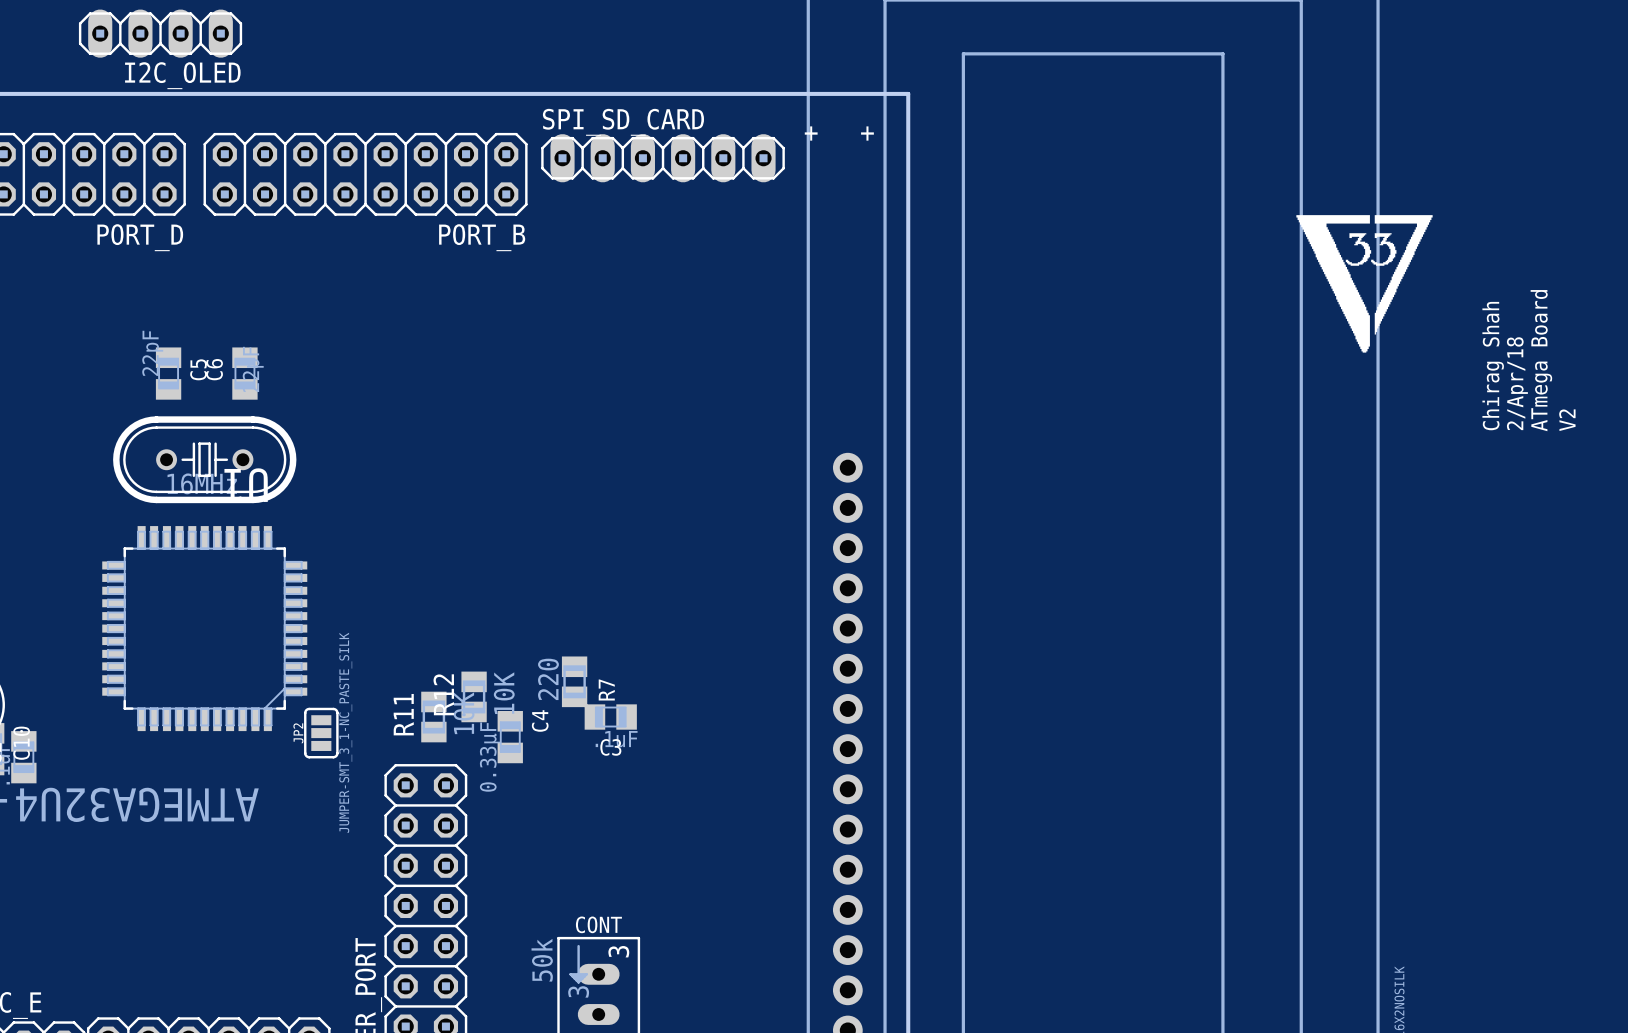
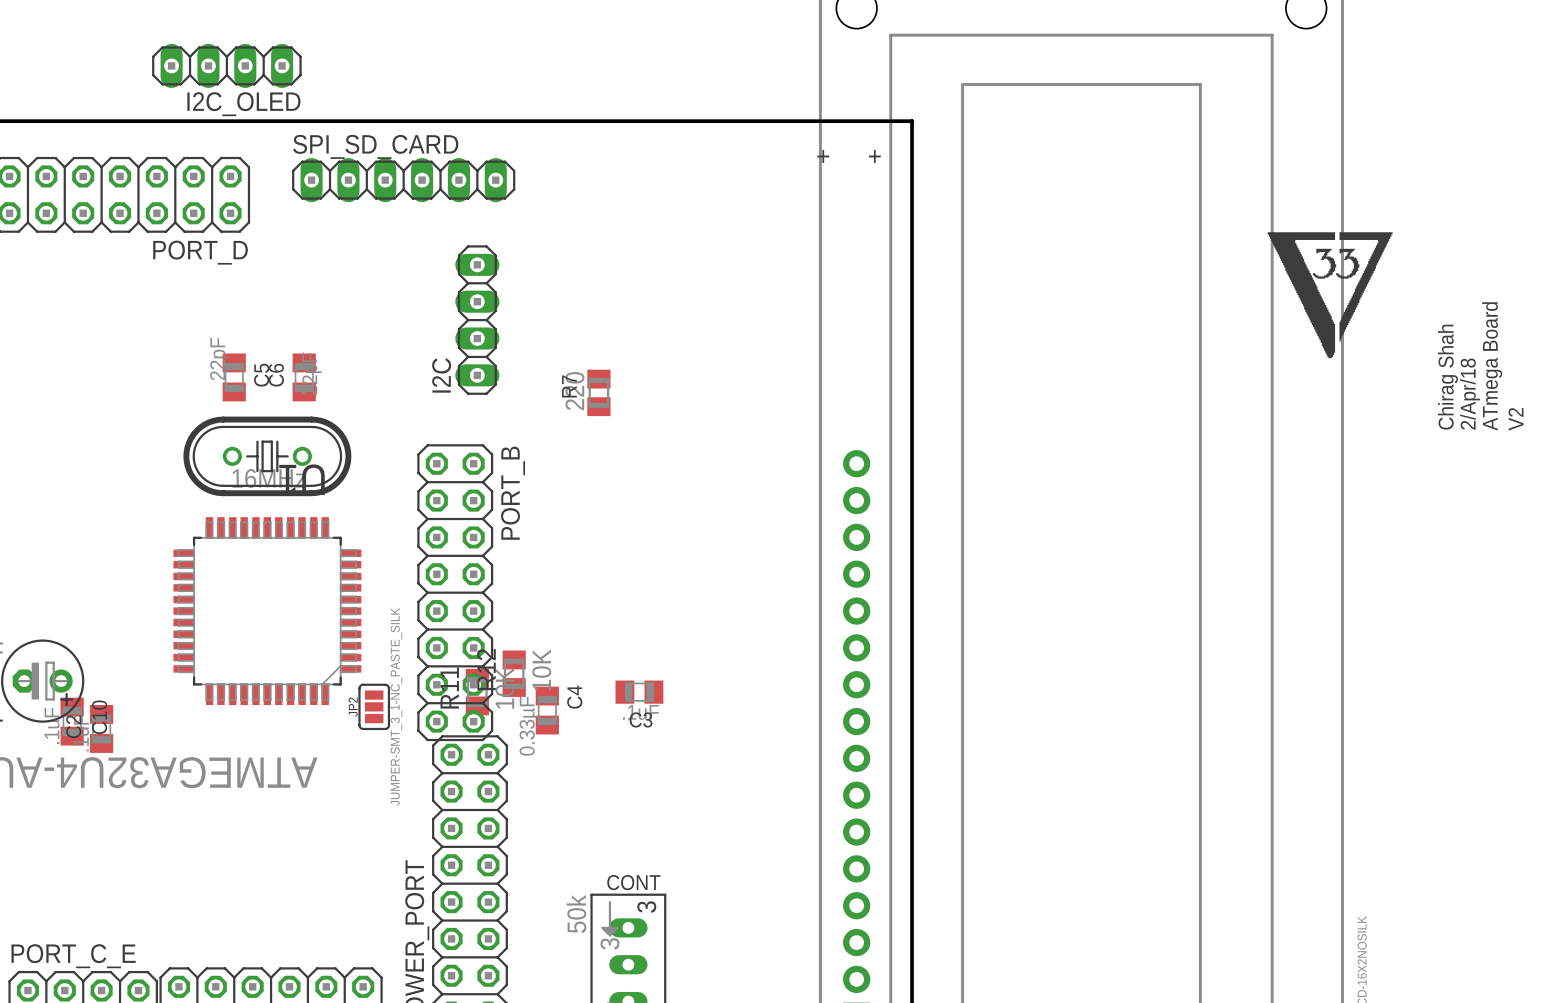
SPI_SD_CARD position: (663, 158) -> (403, 180)
PORT_B: (365, 174) -> none
I2C: none -> (477, 320)
PORT_B: none -> (455, 592)
R7 position: (574, 681) -> (598, 392)
R7 name position: R7 (606, 690) -> R7 (569, 386)

